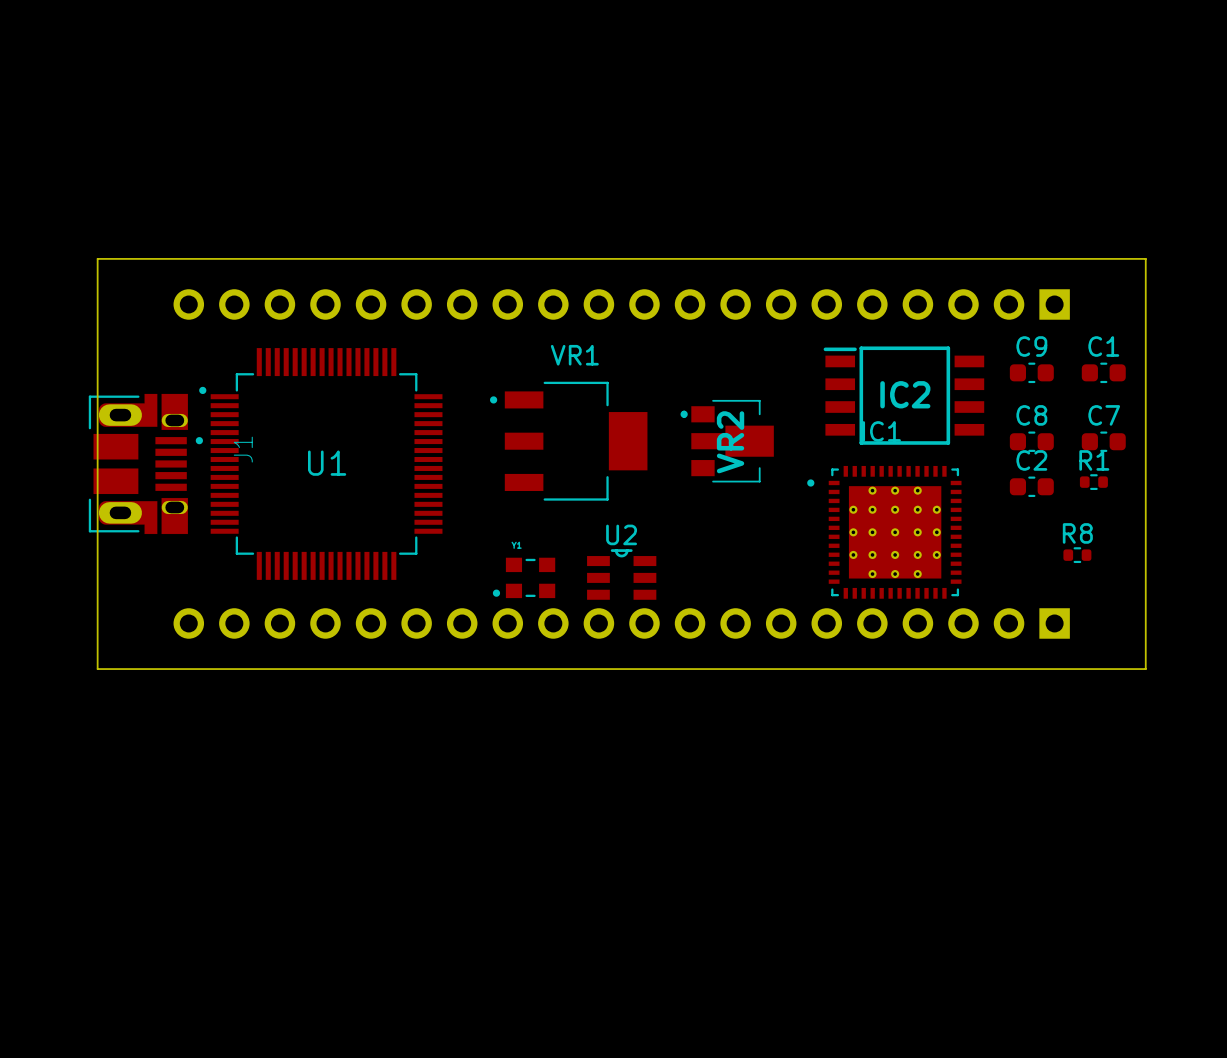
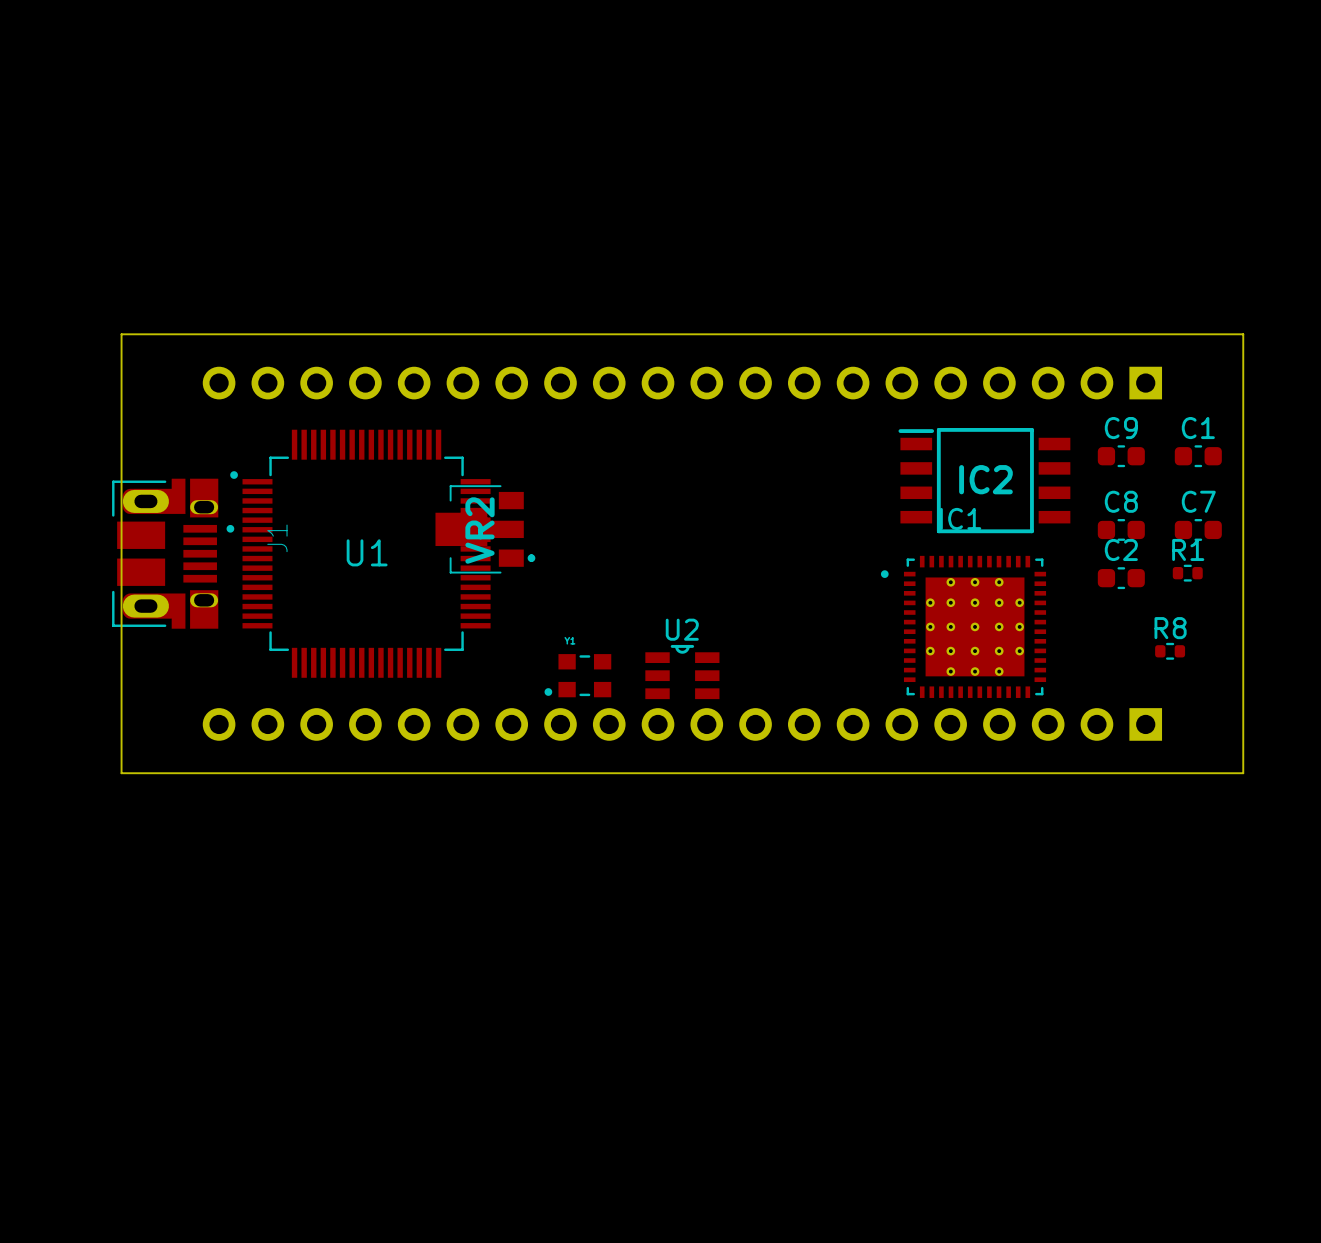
VR1: (568, 441) -> none
VR2 rotation: 0° (727, 441) -> 180° (485, 529)
VR2 position: (727, 441) -> (485, 529)

